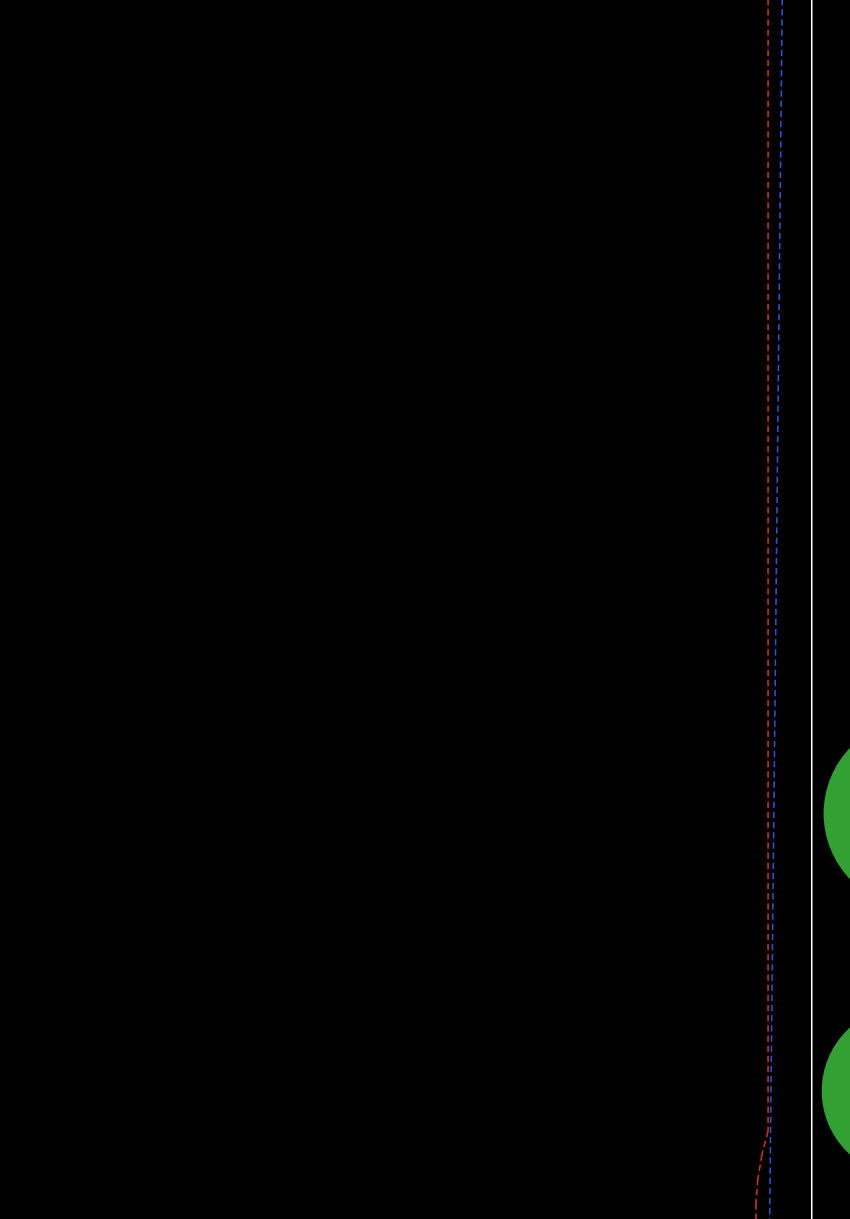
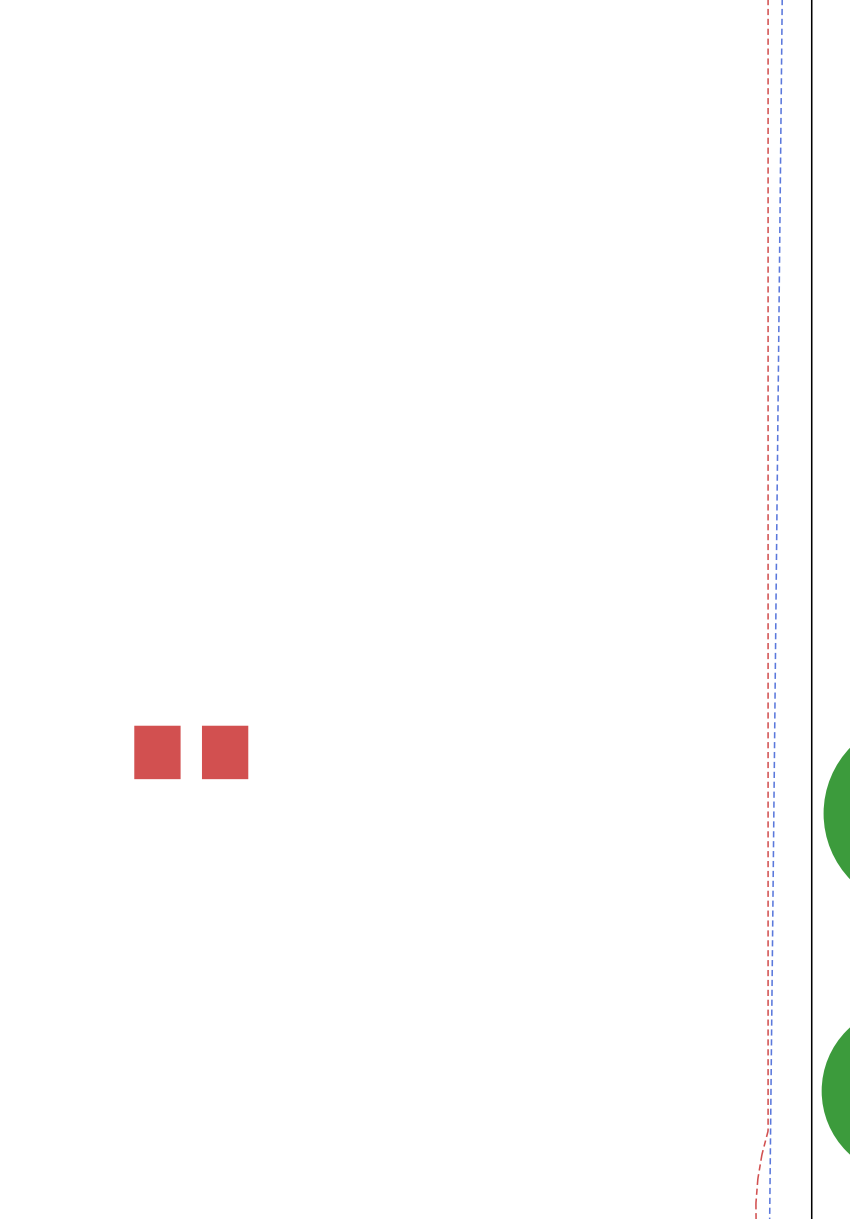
part: none -> (191, 752)

